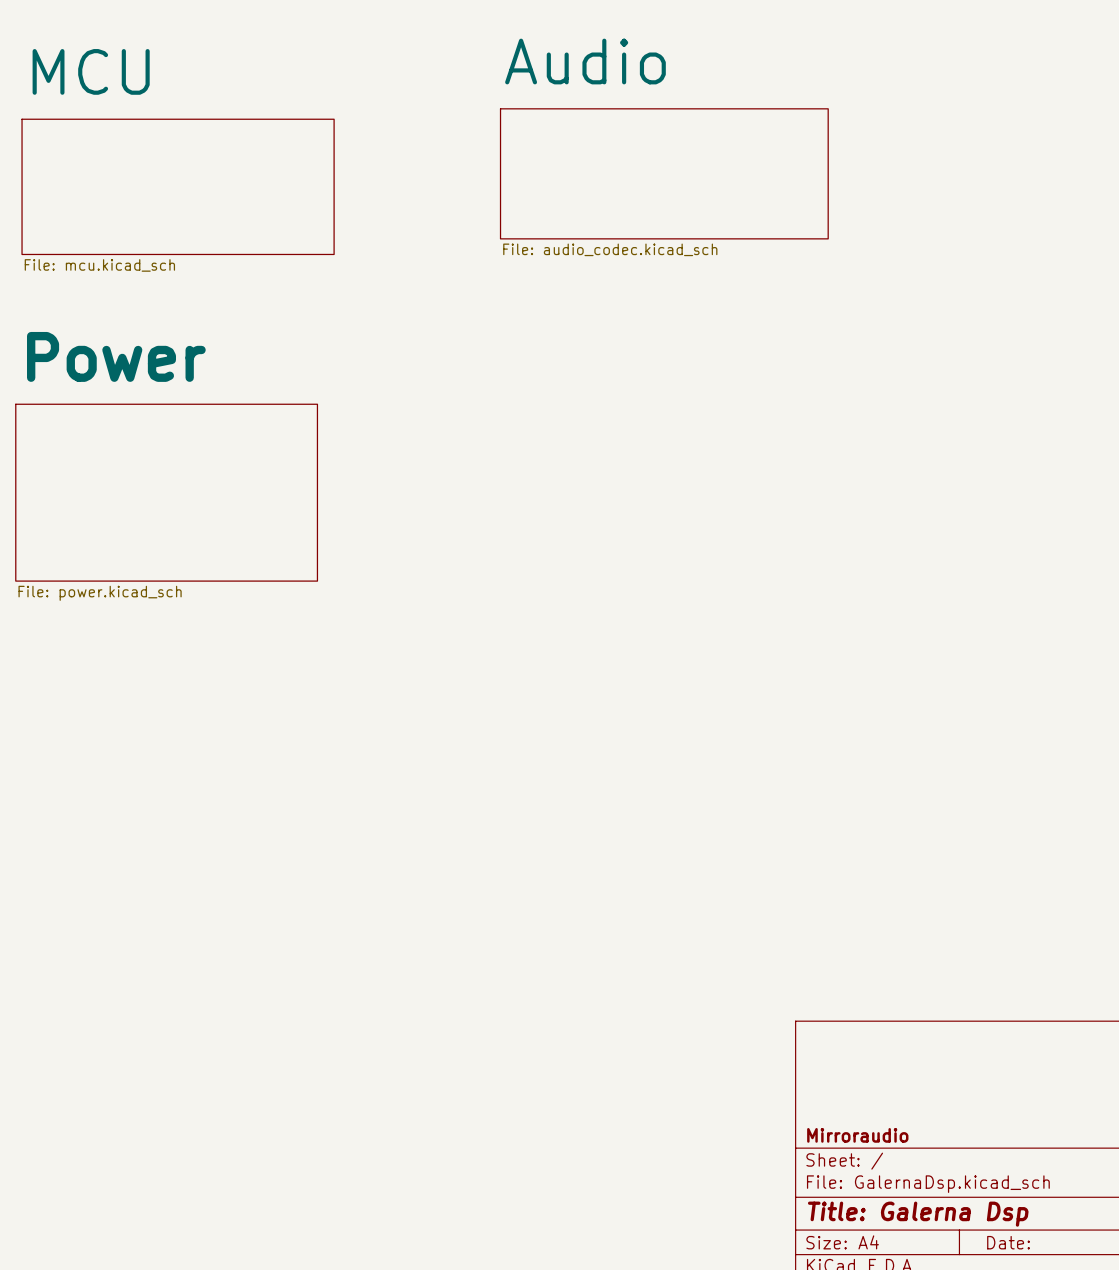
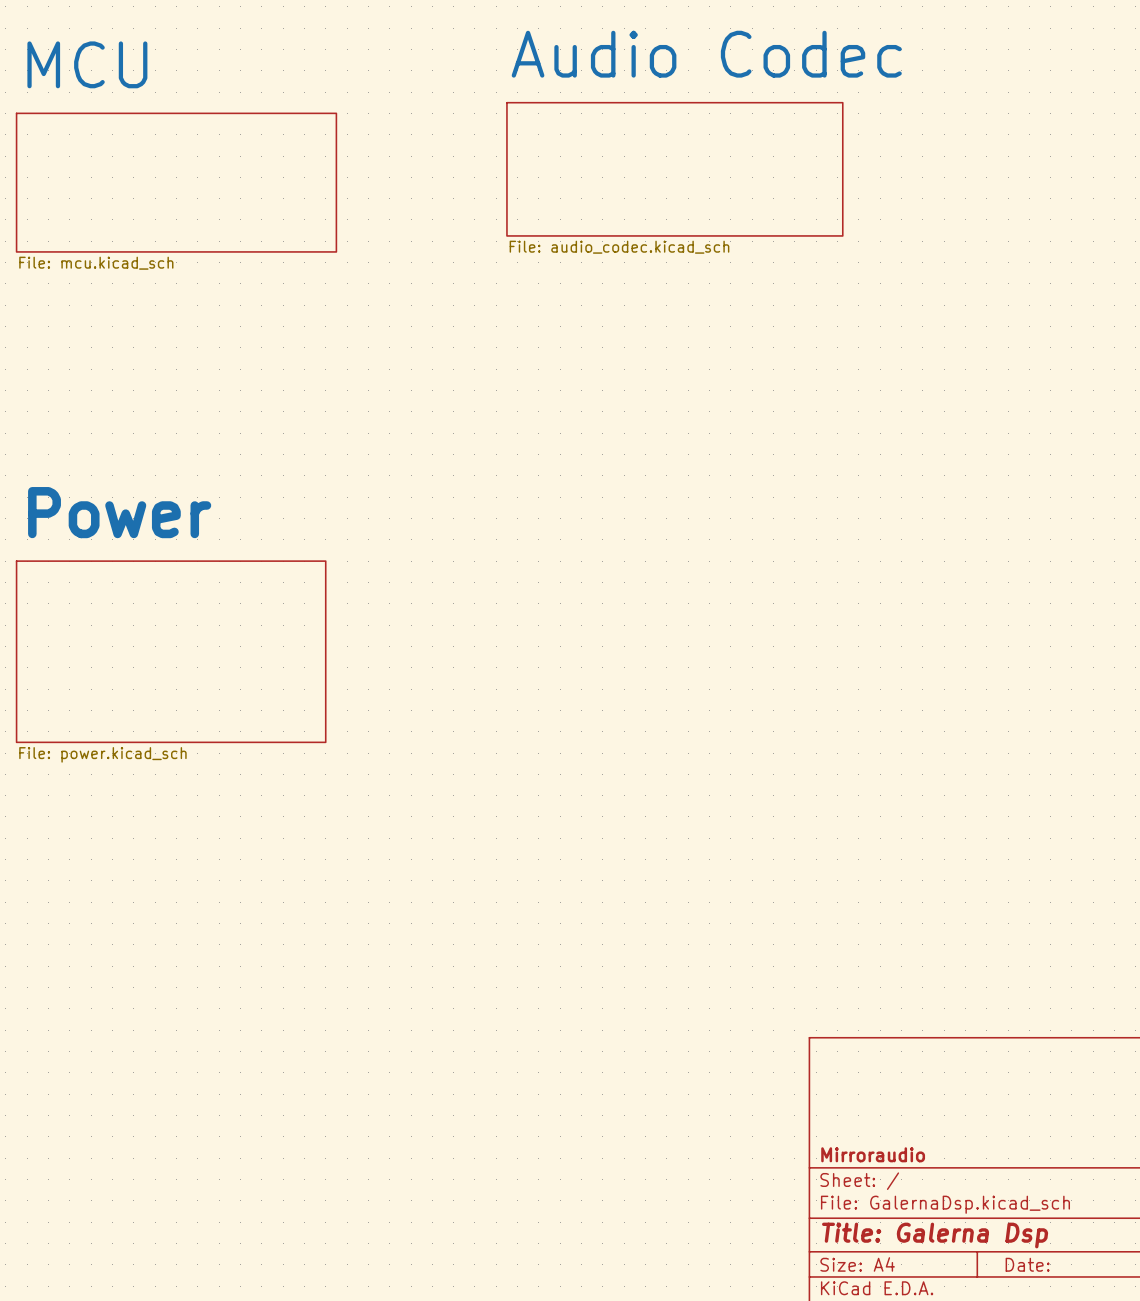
sheet Audio name: Audio (585, 61) -> Audio Codec (706, 54)
sheet Power position: (166, 492) -> (171, 651)

